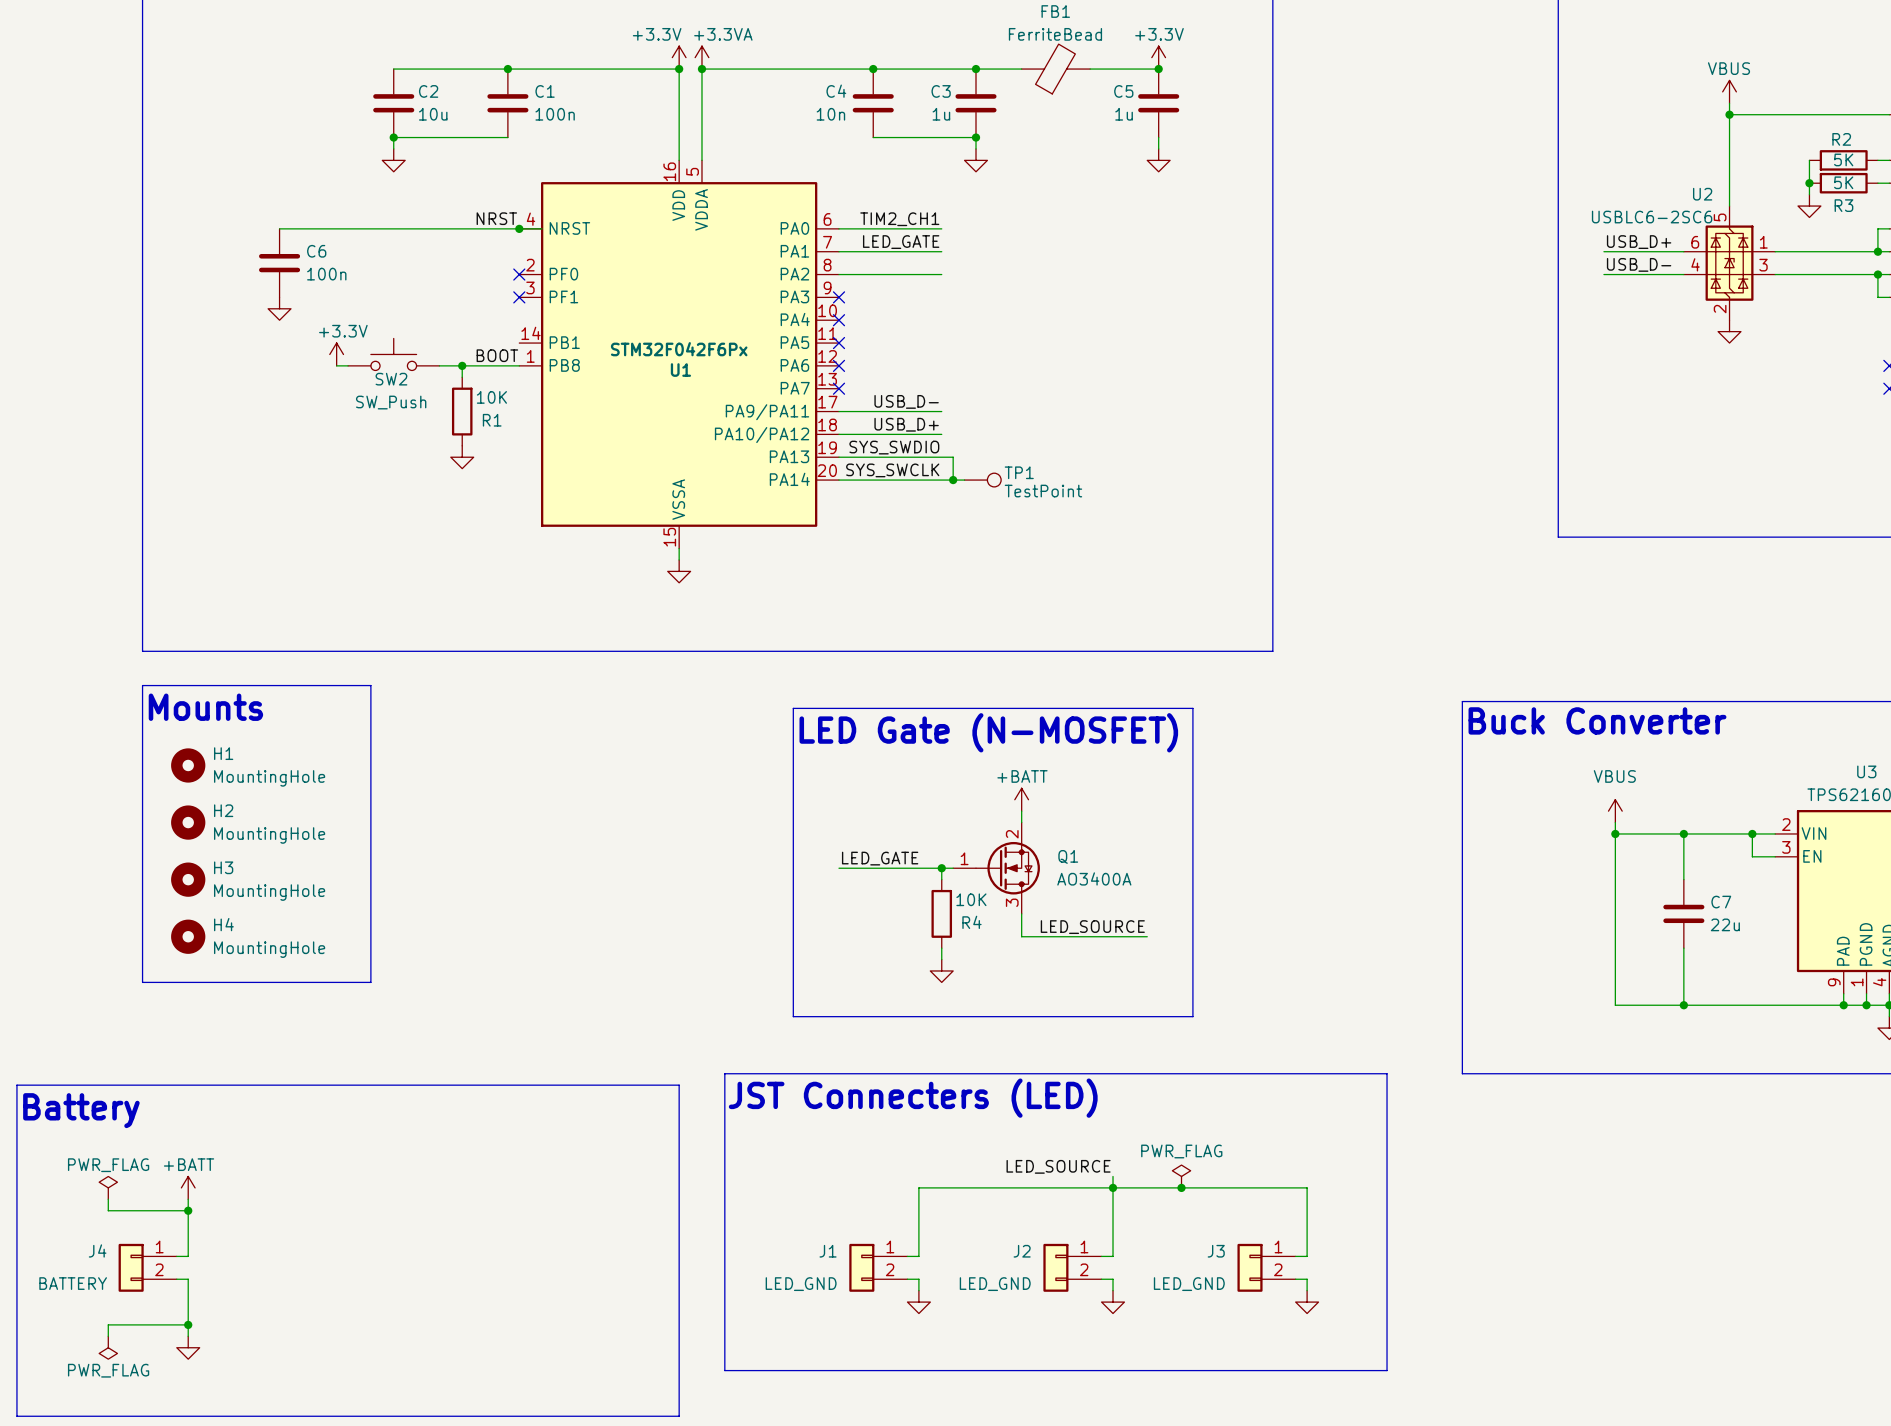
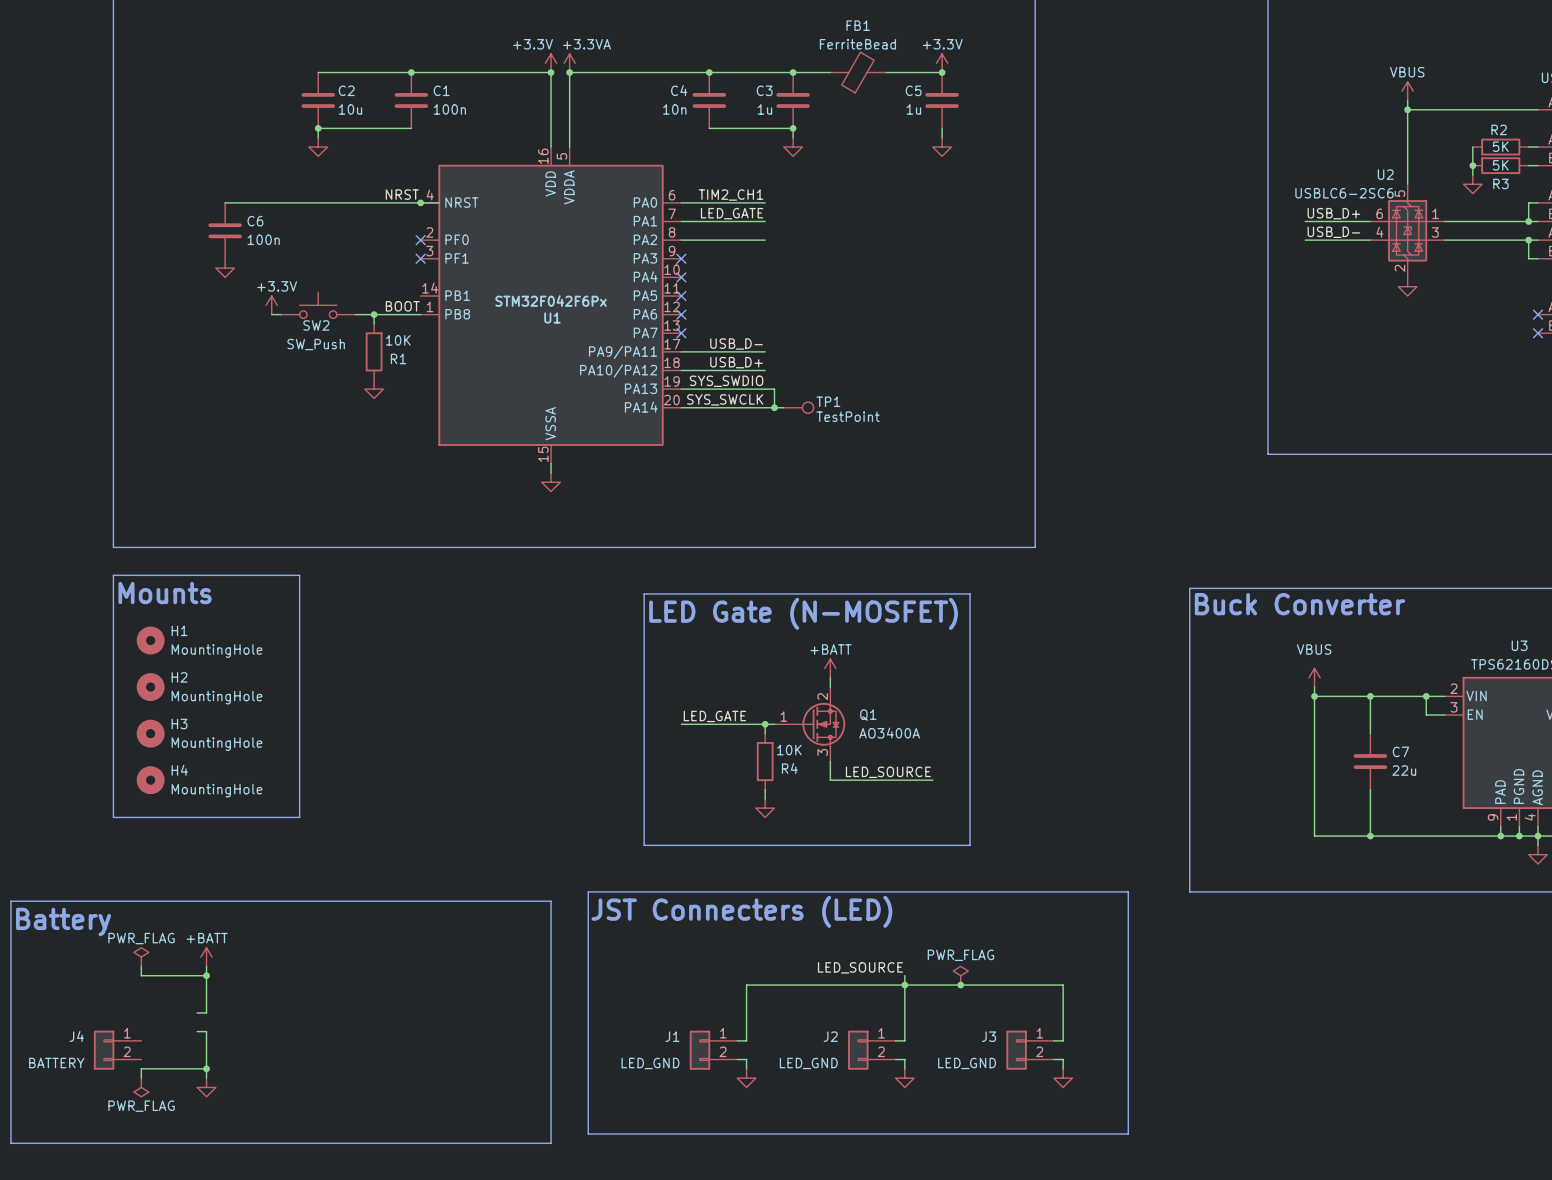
power symbol: none -> PWR_FLAG (141, 957)
junction: none -> (206, 975)
power symbol: PWR_FLAG (108, 1187) -> none
power symbol position: +BATT (188, 1187) -> +BATT (206, 957)
wire: (108, 1199) (108, 1210) (188, 1210) -> (141, 966) (141, 975) (206, 975)
wire: (188, 1199) (188, 1256) (176, 1256) -> (206, 966) (206, 1012) (197, 1012)
junction: (188, 1210) -> none
wire: (176, 1279) (188, 1279) (188, 1336) -> (197, 1031) (206, 1031) (206, 1078)
junction: none -> (206, 1068)
power symbol: none -> PWR_FLAG (141, 1087)
wire: (188, 1324) (108, 1324) (108, 1336) -> (206, 1068) (141, 1068) (141, 1078)
junction: (188, 1324) -> none
power symbol: PWR_FLAG (108, 1347) -> none
power symbol position: (188, 1347) -> (206, 1087)
line: (16, 1382) (16, 1416) (679, 1416) (679, 1382) -> (10, 1143) (551, 1143)

